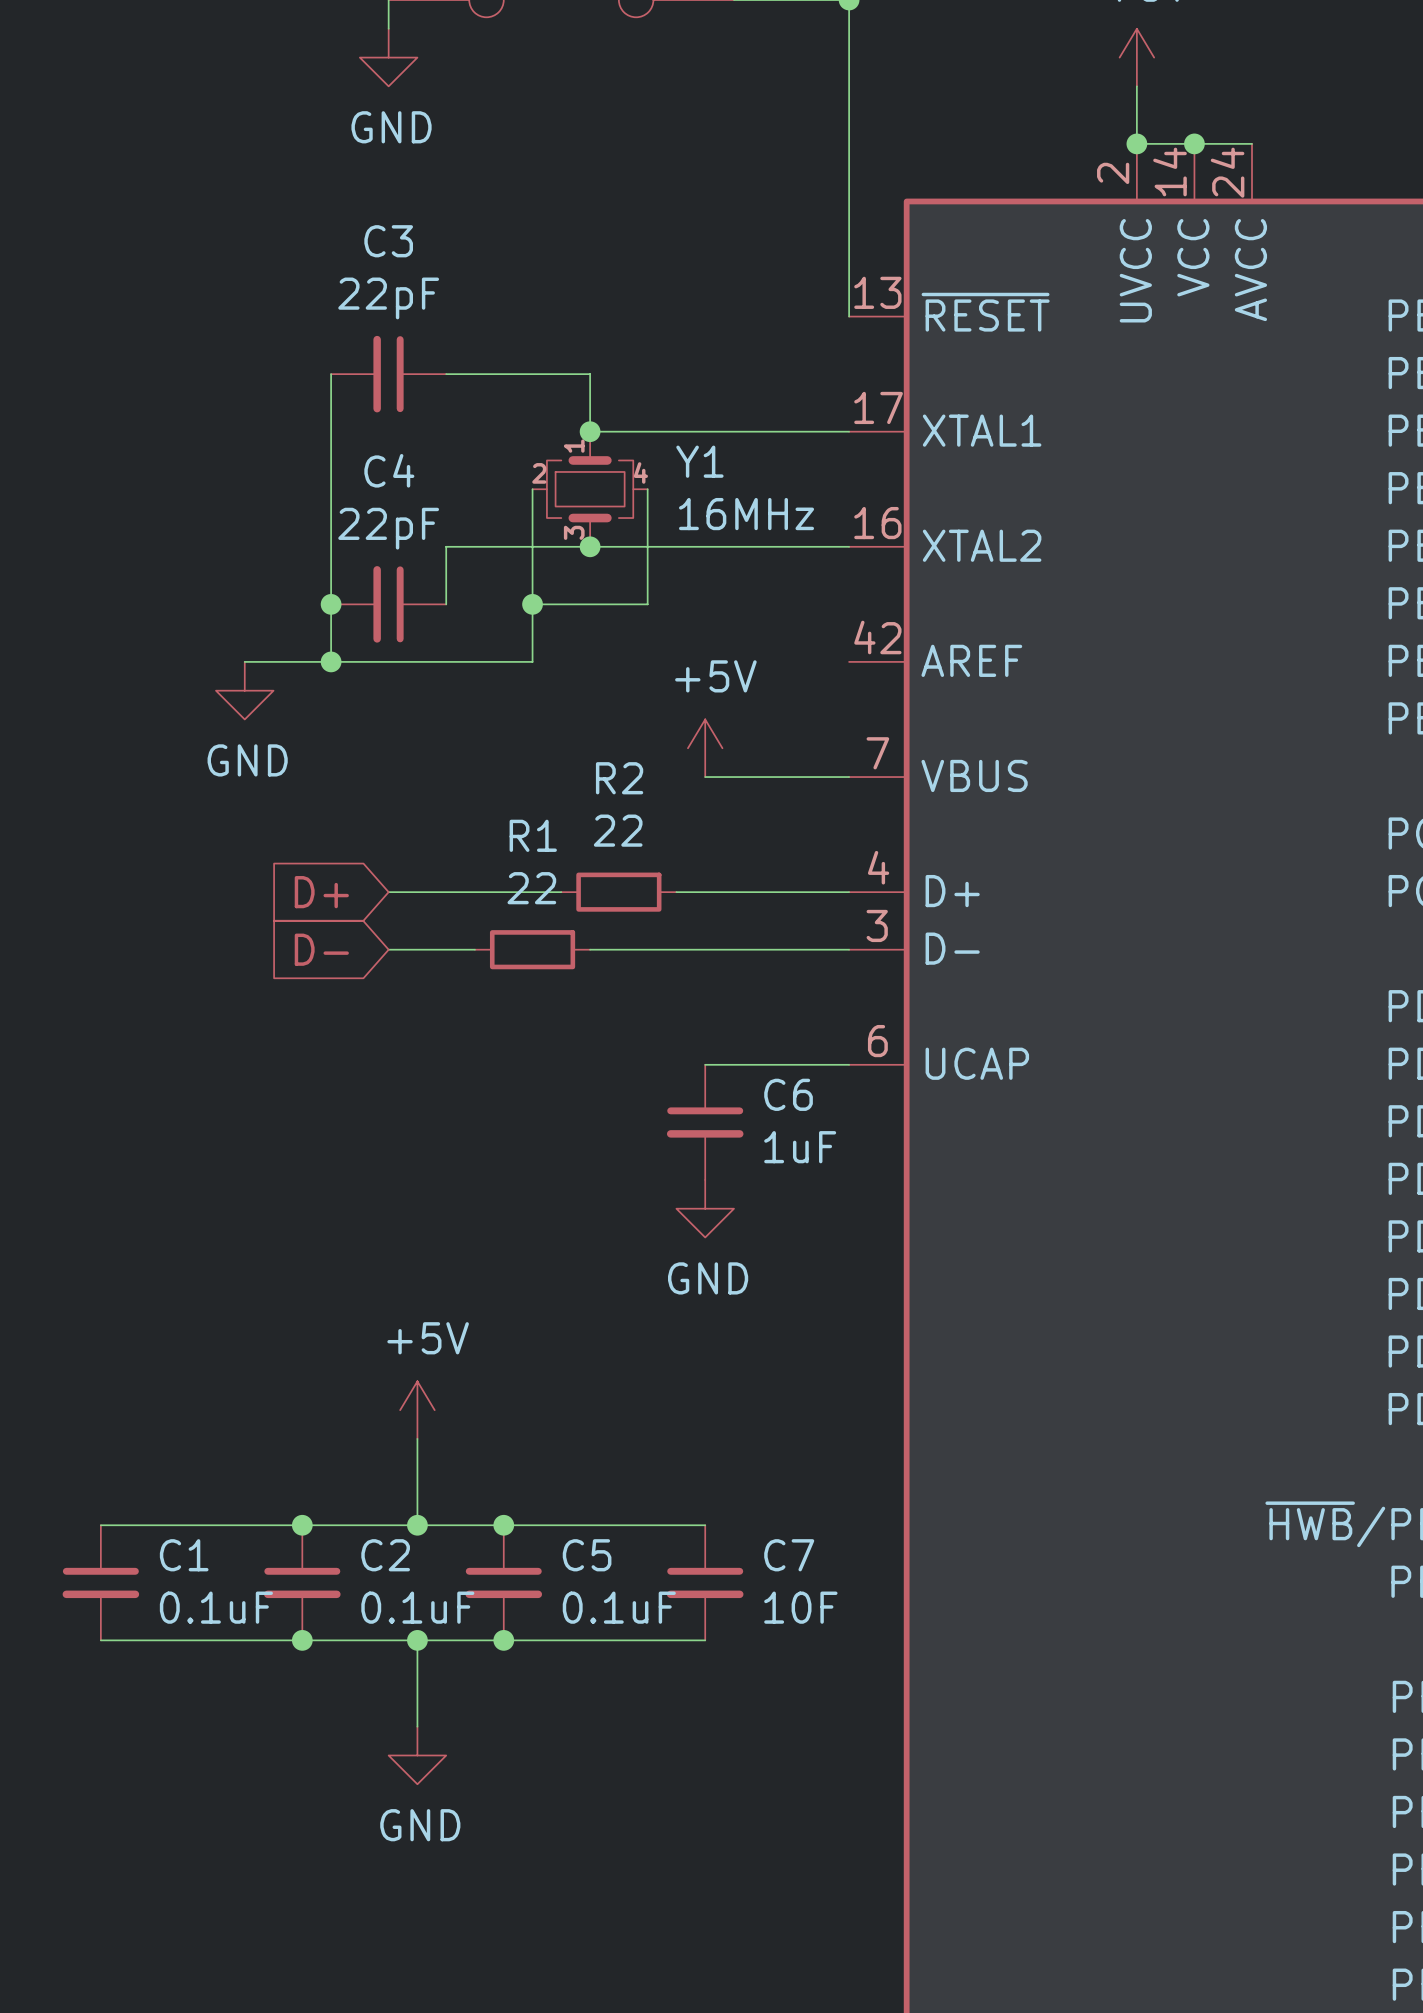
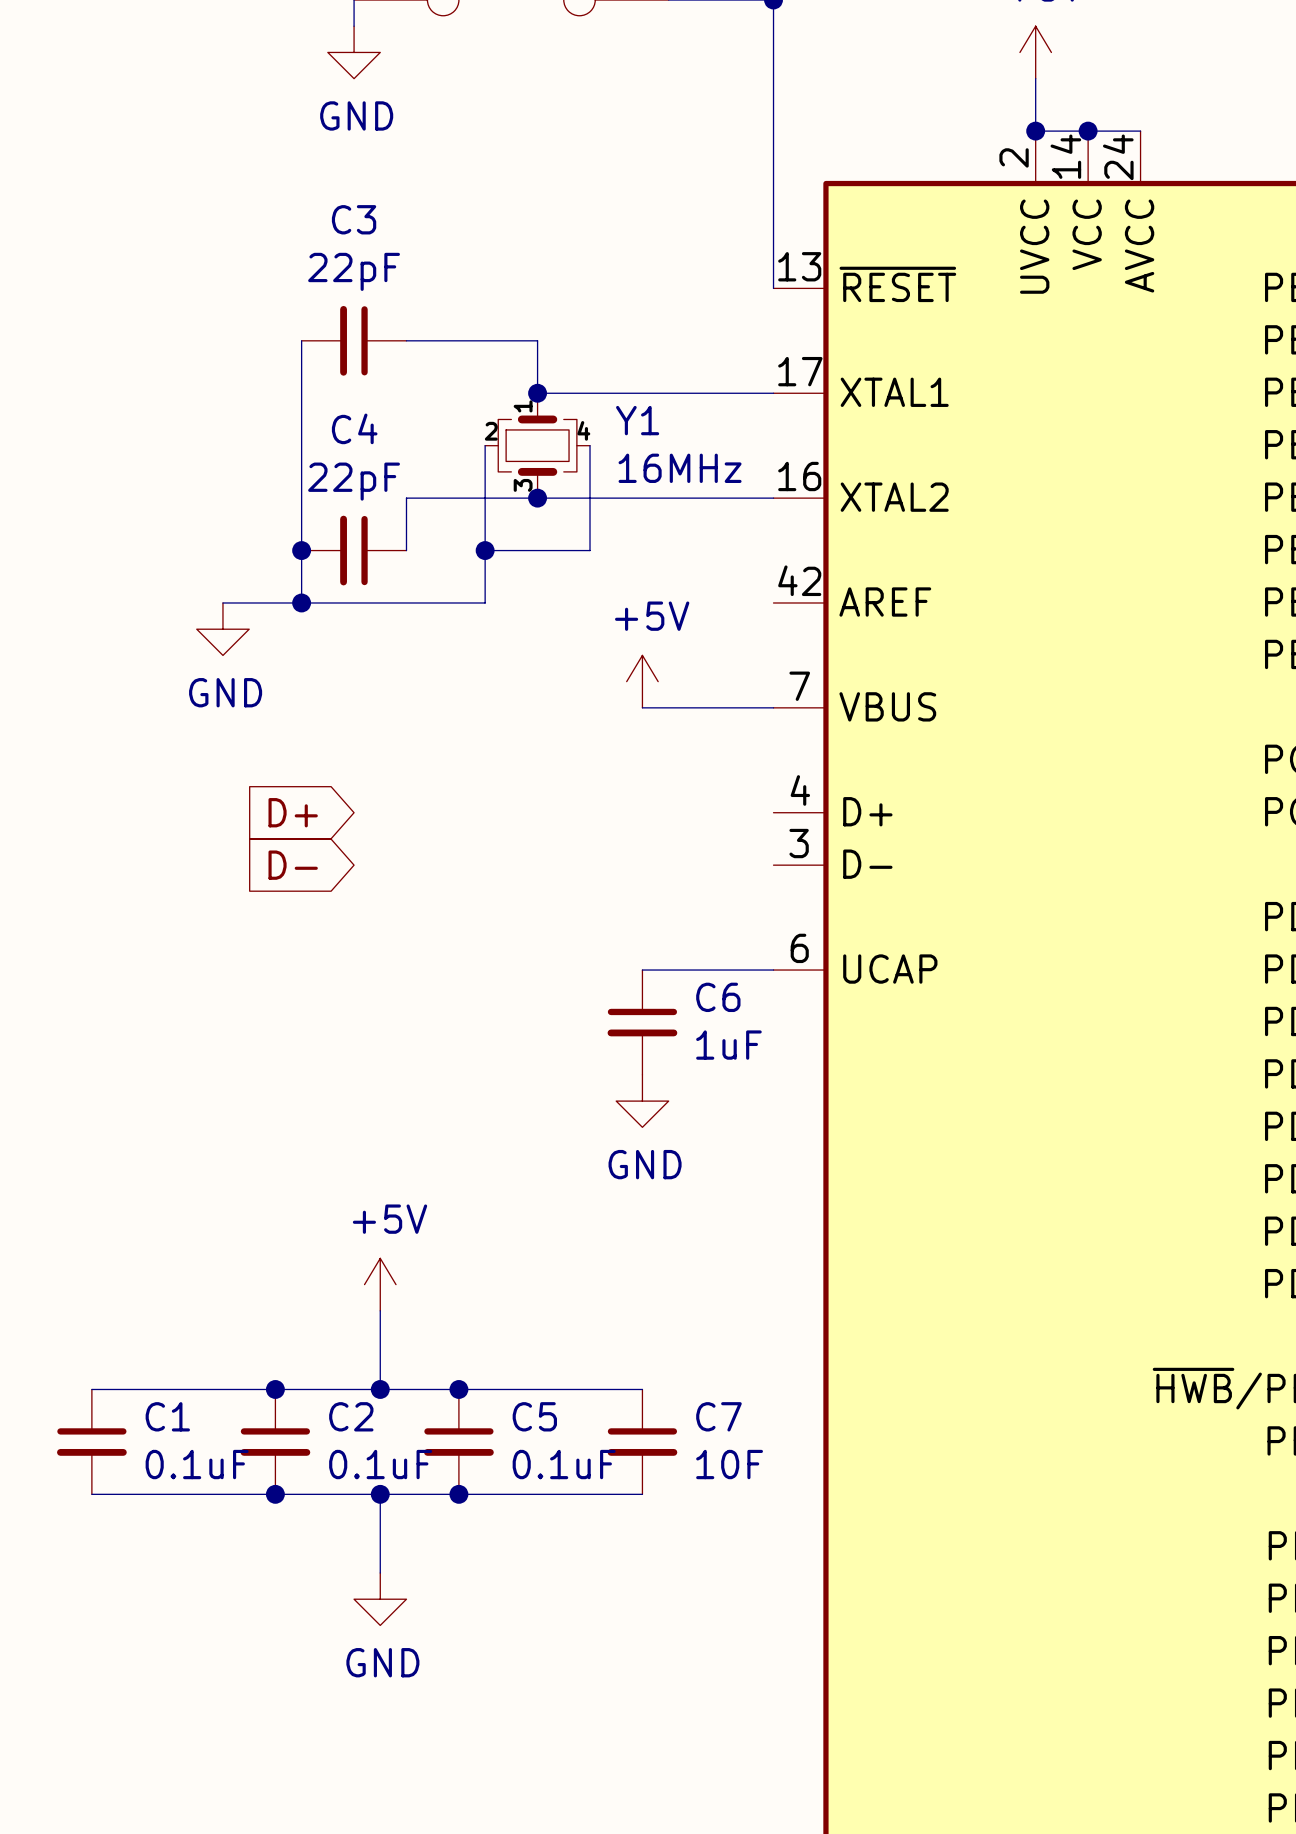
wire: (388, 892) (561, 892) -> none
R2: 22 (618, 892) -> none
wire: (676, 892) (849, 892) -> none
wire: (388, 949) (474, 949) -> none
R1: 22 (532, 949) -> none
wire: (590, 949) (849, 949) -> none

